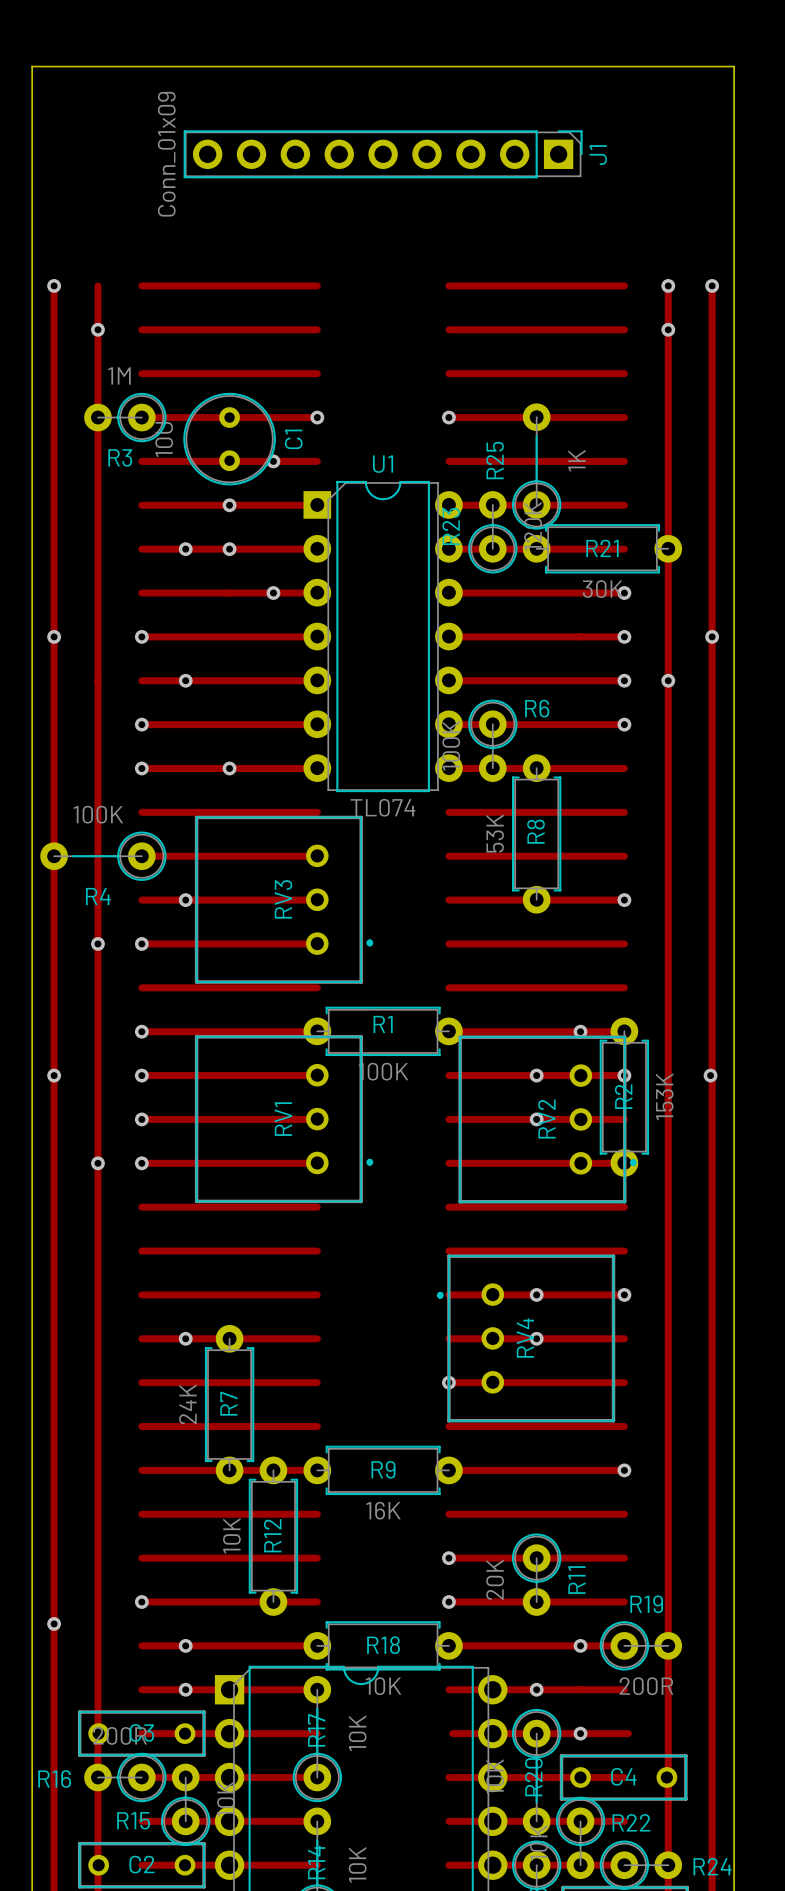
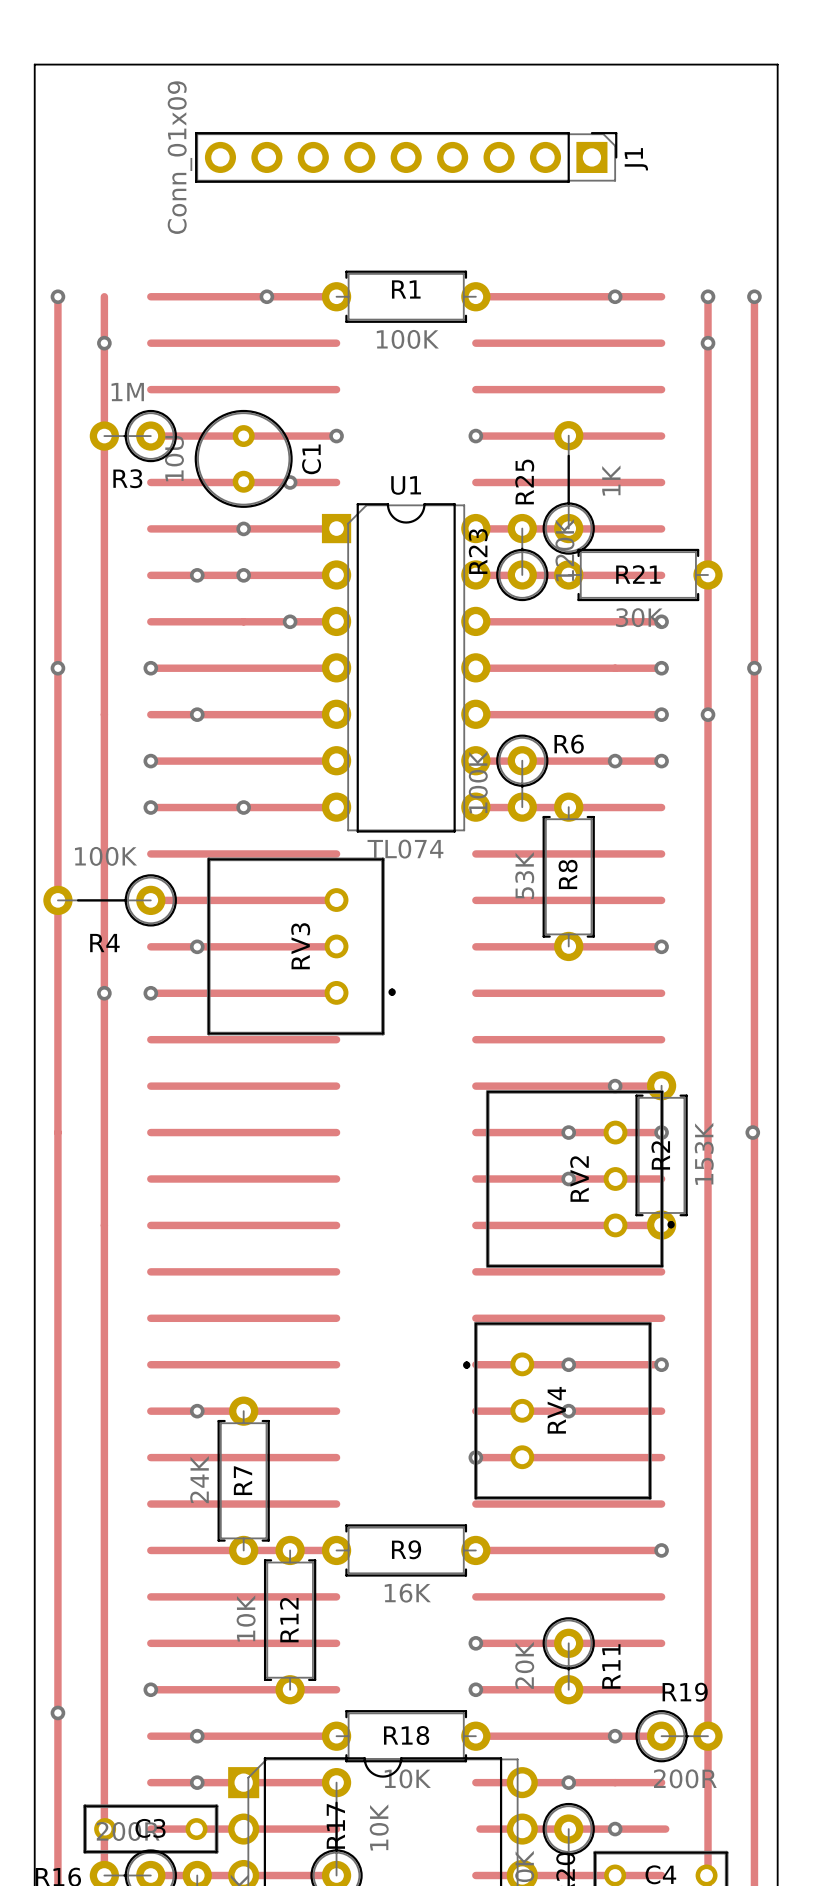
via: none -> (266, 296)
via: none -> (615, 296)
via: none -> (615, 761)
via: (141, 1031) -> none
R1 position: (383, 1031) -> (406, 296)
via: (54, 1075) -> none
via: (141, 1075) -> none
via: (141, 1119) -> none
RV1: (284, 1119) -> none
via: (97, 1163) -> none
via: (141, 1163) -> none

